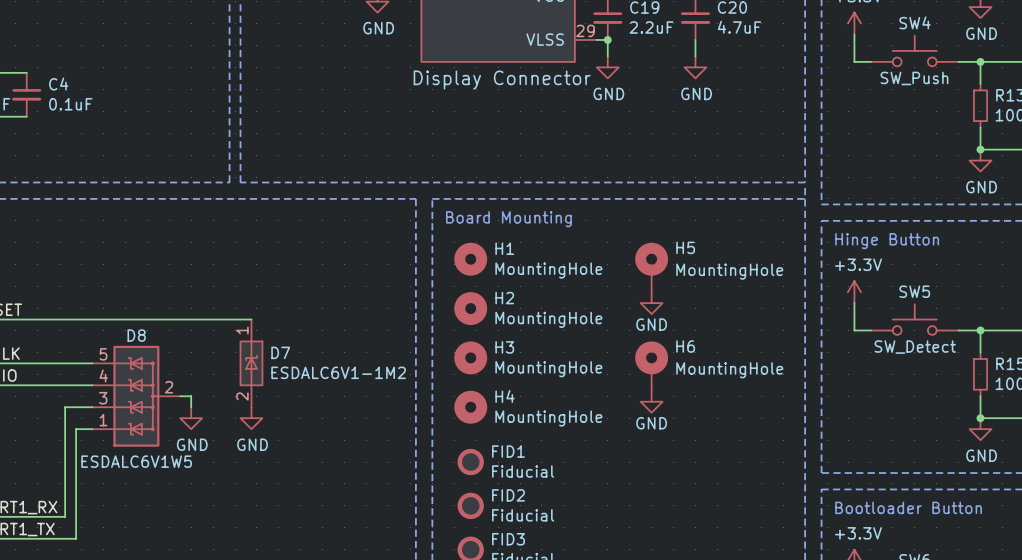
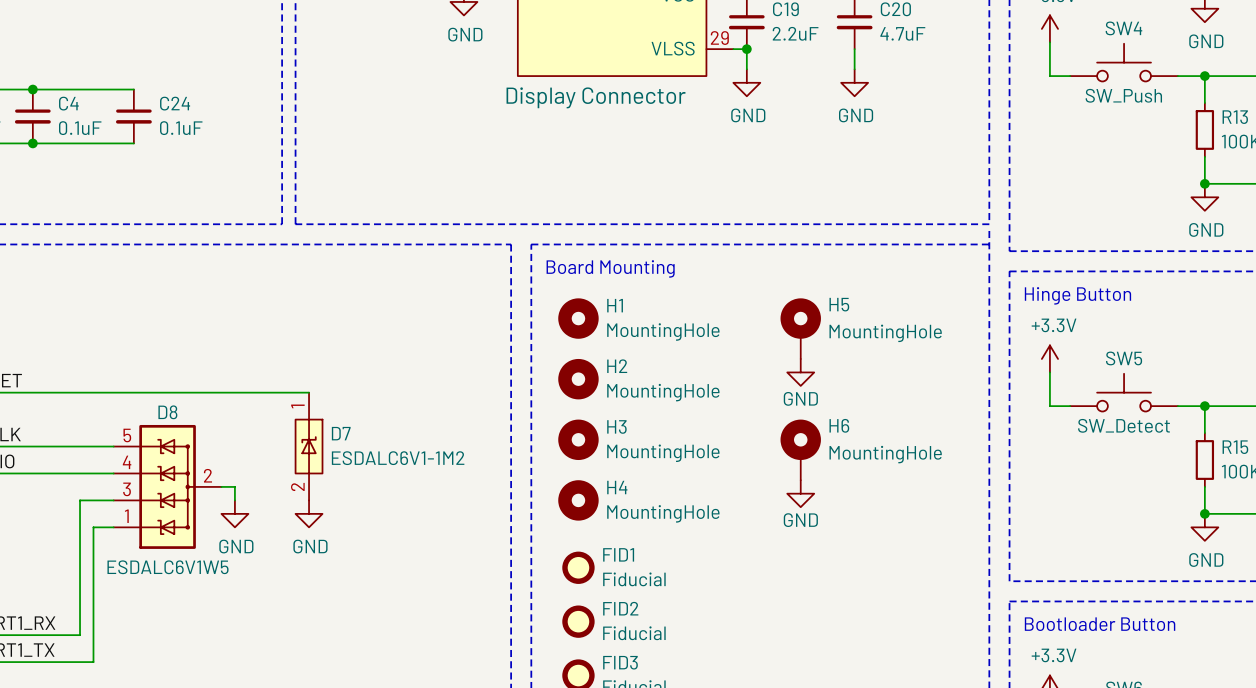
wire: none -> (32, 89) (133, 89)
junction: none -> (32, 89)
C24: none -> 0.1uF (133, 116)
wire: none -> (32, 143) (133, 143)
junction: none -> (32, 143)

